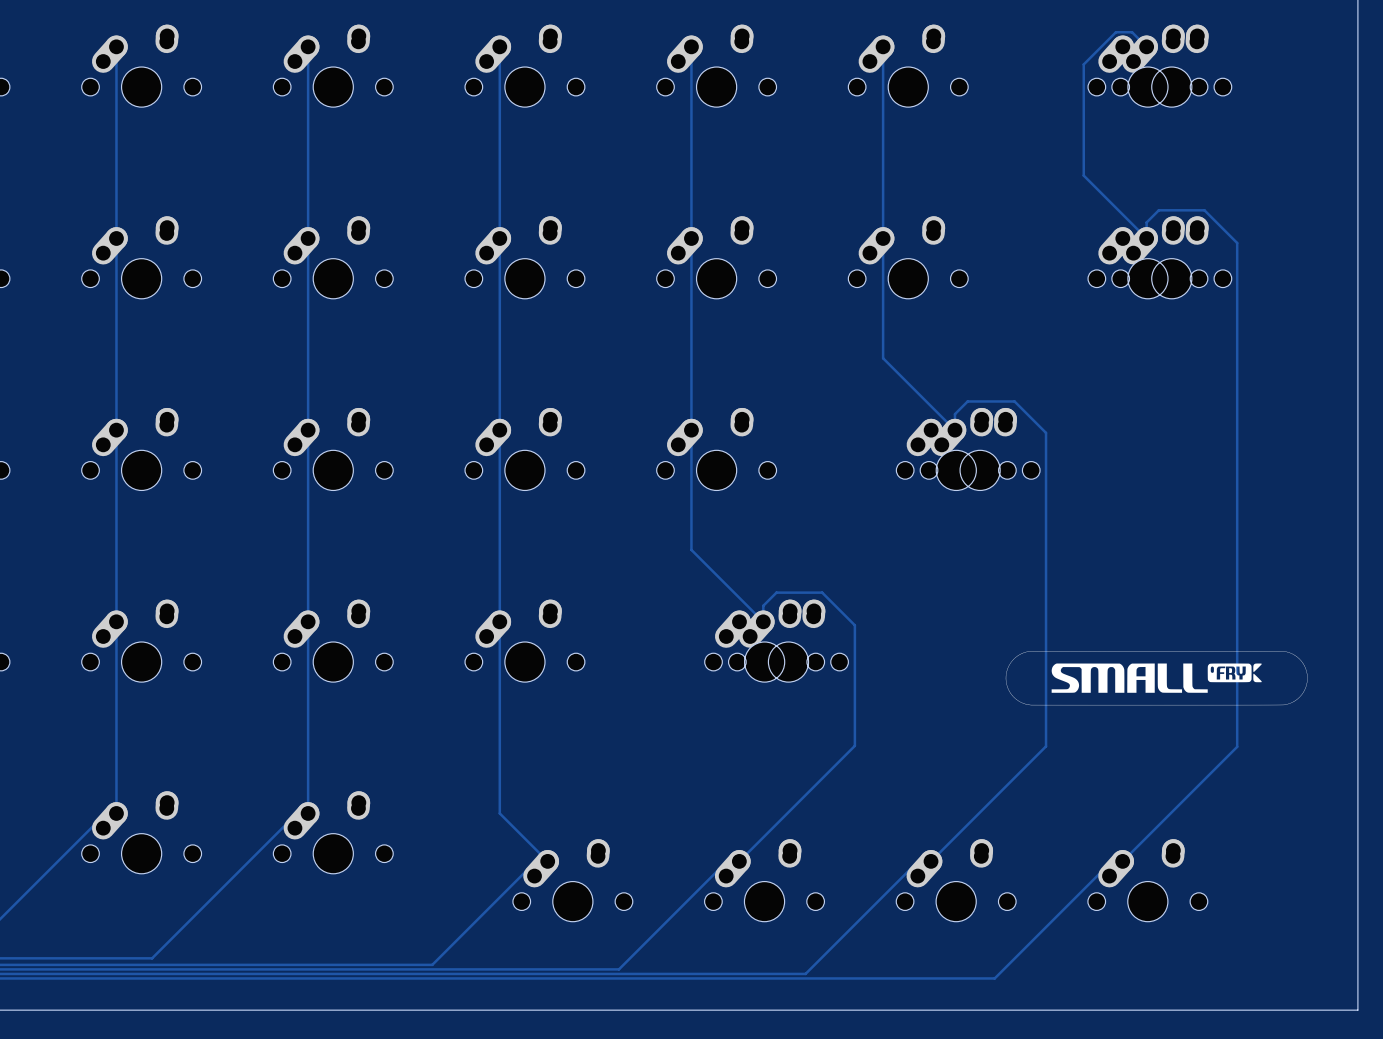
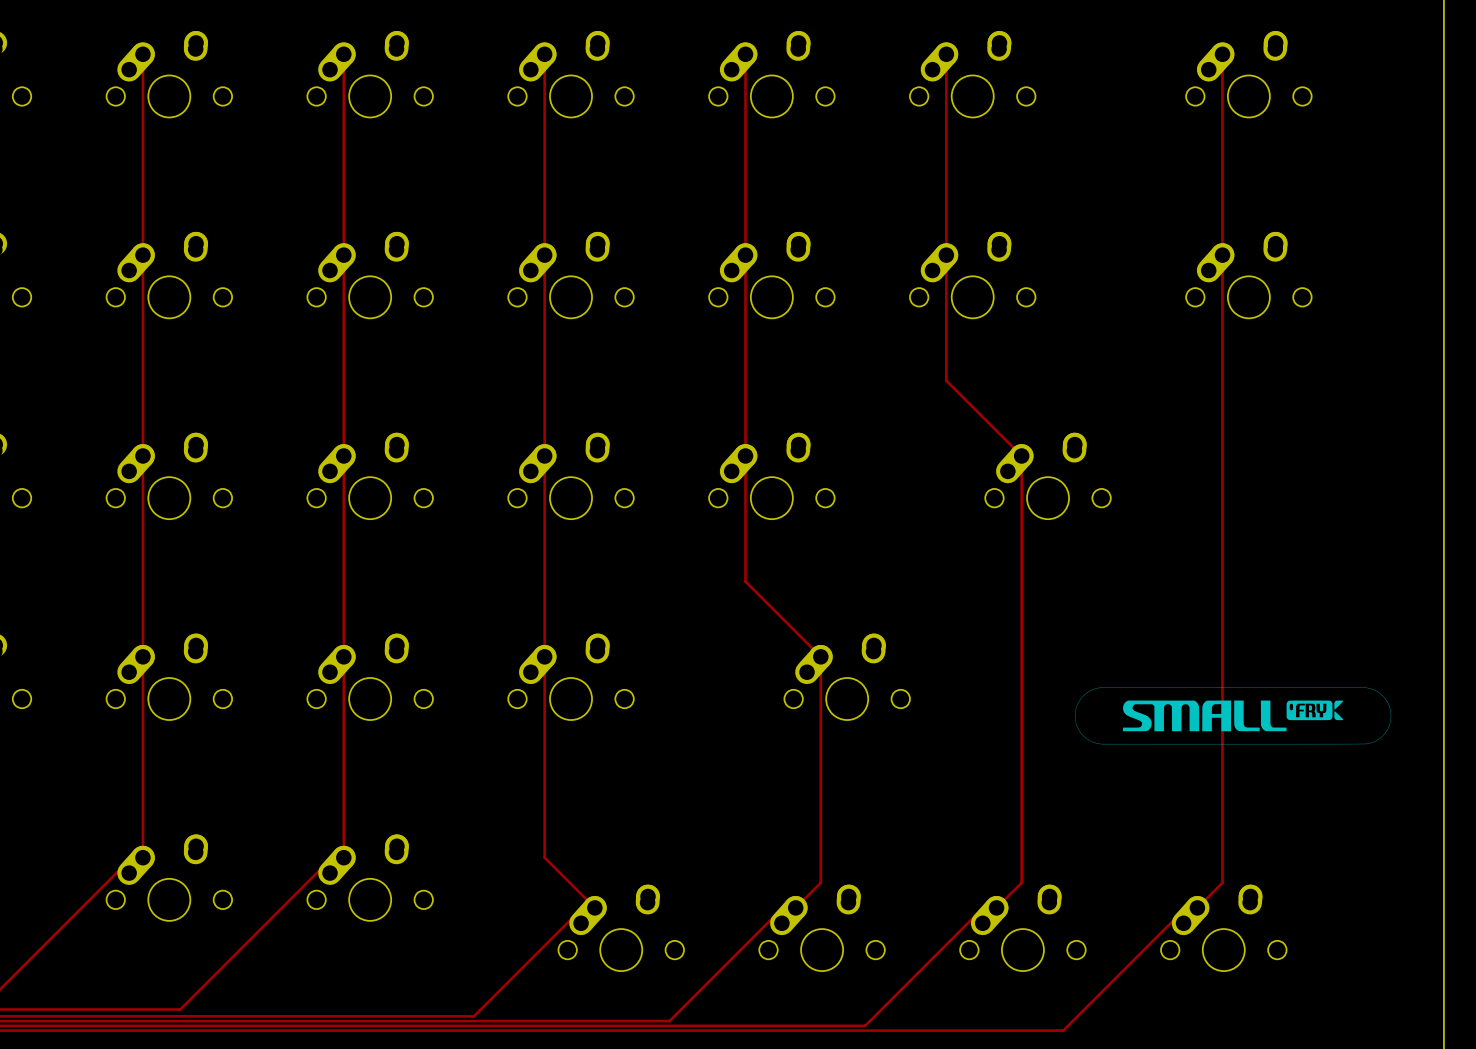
track: (1146, 46) (1132, 32) (1115, 32) (1083, 64) (1083, 175) (1146, 238) -> (1222, 54) (1222, 238)
part: (1147, 65) -> none
track: (1146, 222) (1158, 210) (1204, 210) (1237, 243) (1237, 746) (1146, 837) -> (1222, 255) (1222, 882)
part: (1147, 257) -> none
track: (954, 430) (954, 414) (967, 401) (1014, 401) (1046, 432) (1046, 746) (954, 837) -> (1021, 455) (1021, 882)
part: (956, 449) -> none
track: (763, 621) (763, 605) (776, 592) (822, 592) (854, 625) (854, 745) (763, 837) -> (820, 656) (820, 882)
part: (764, 640) -> none

